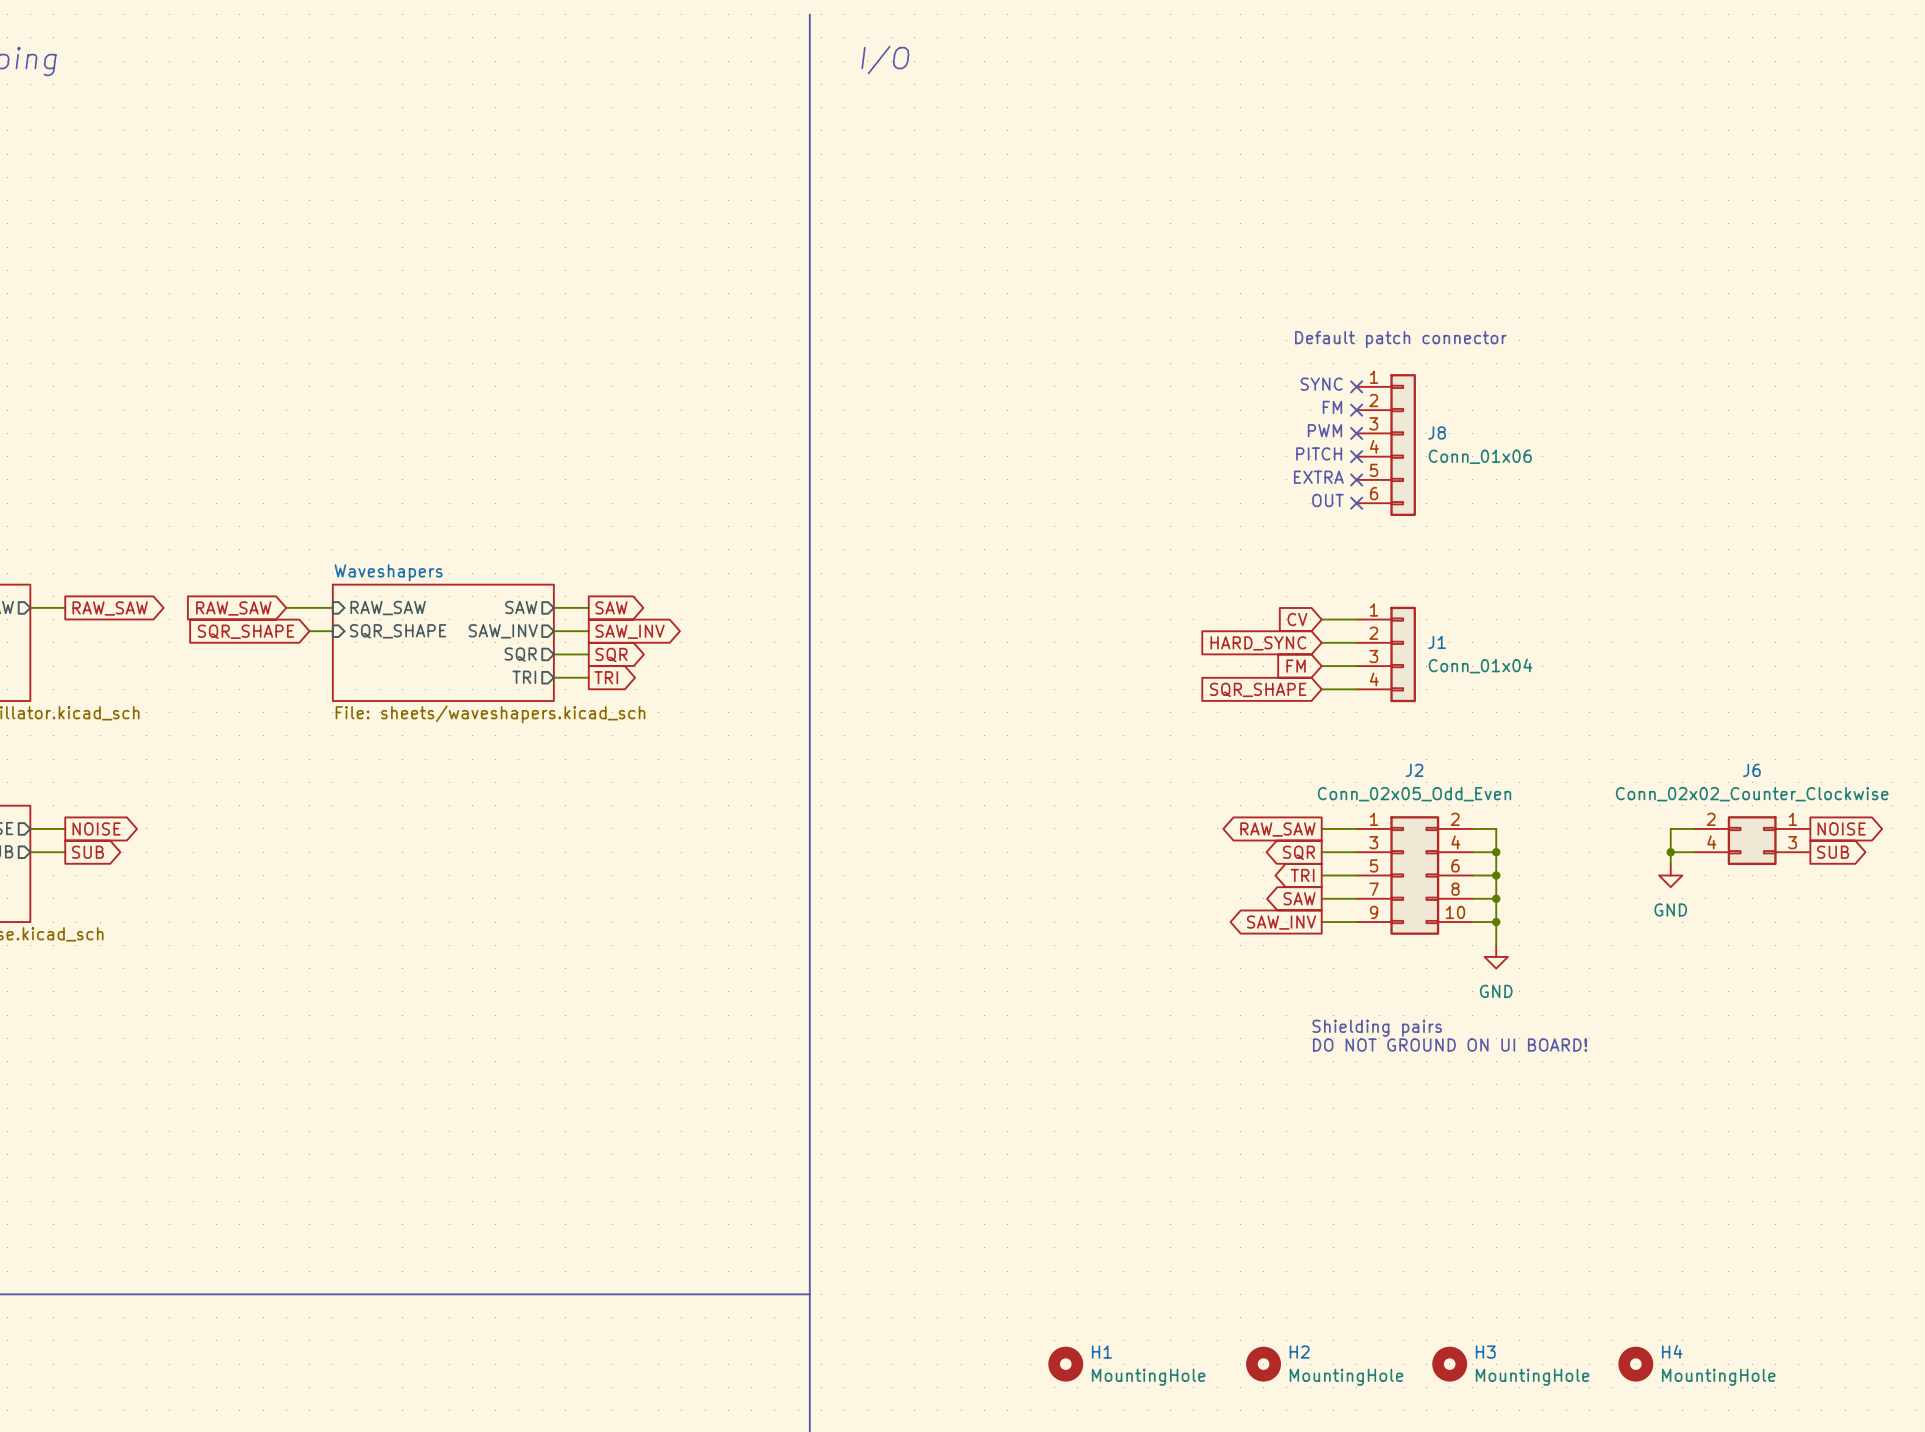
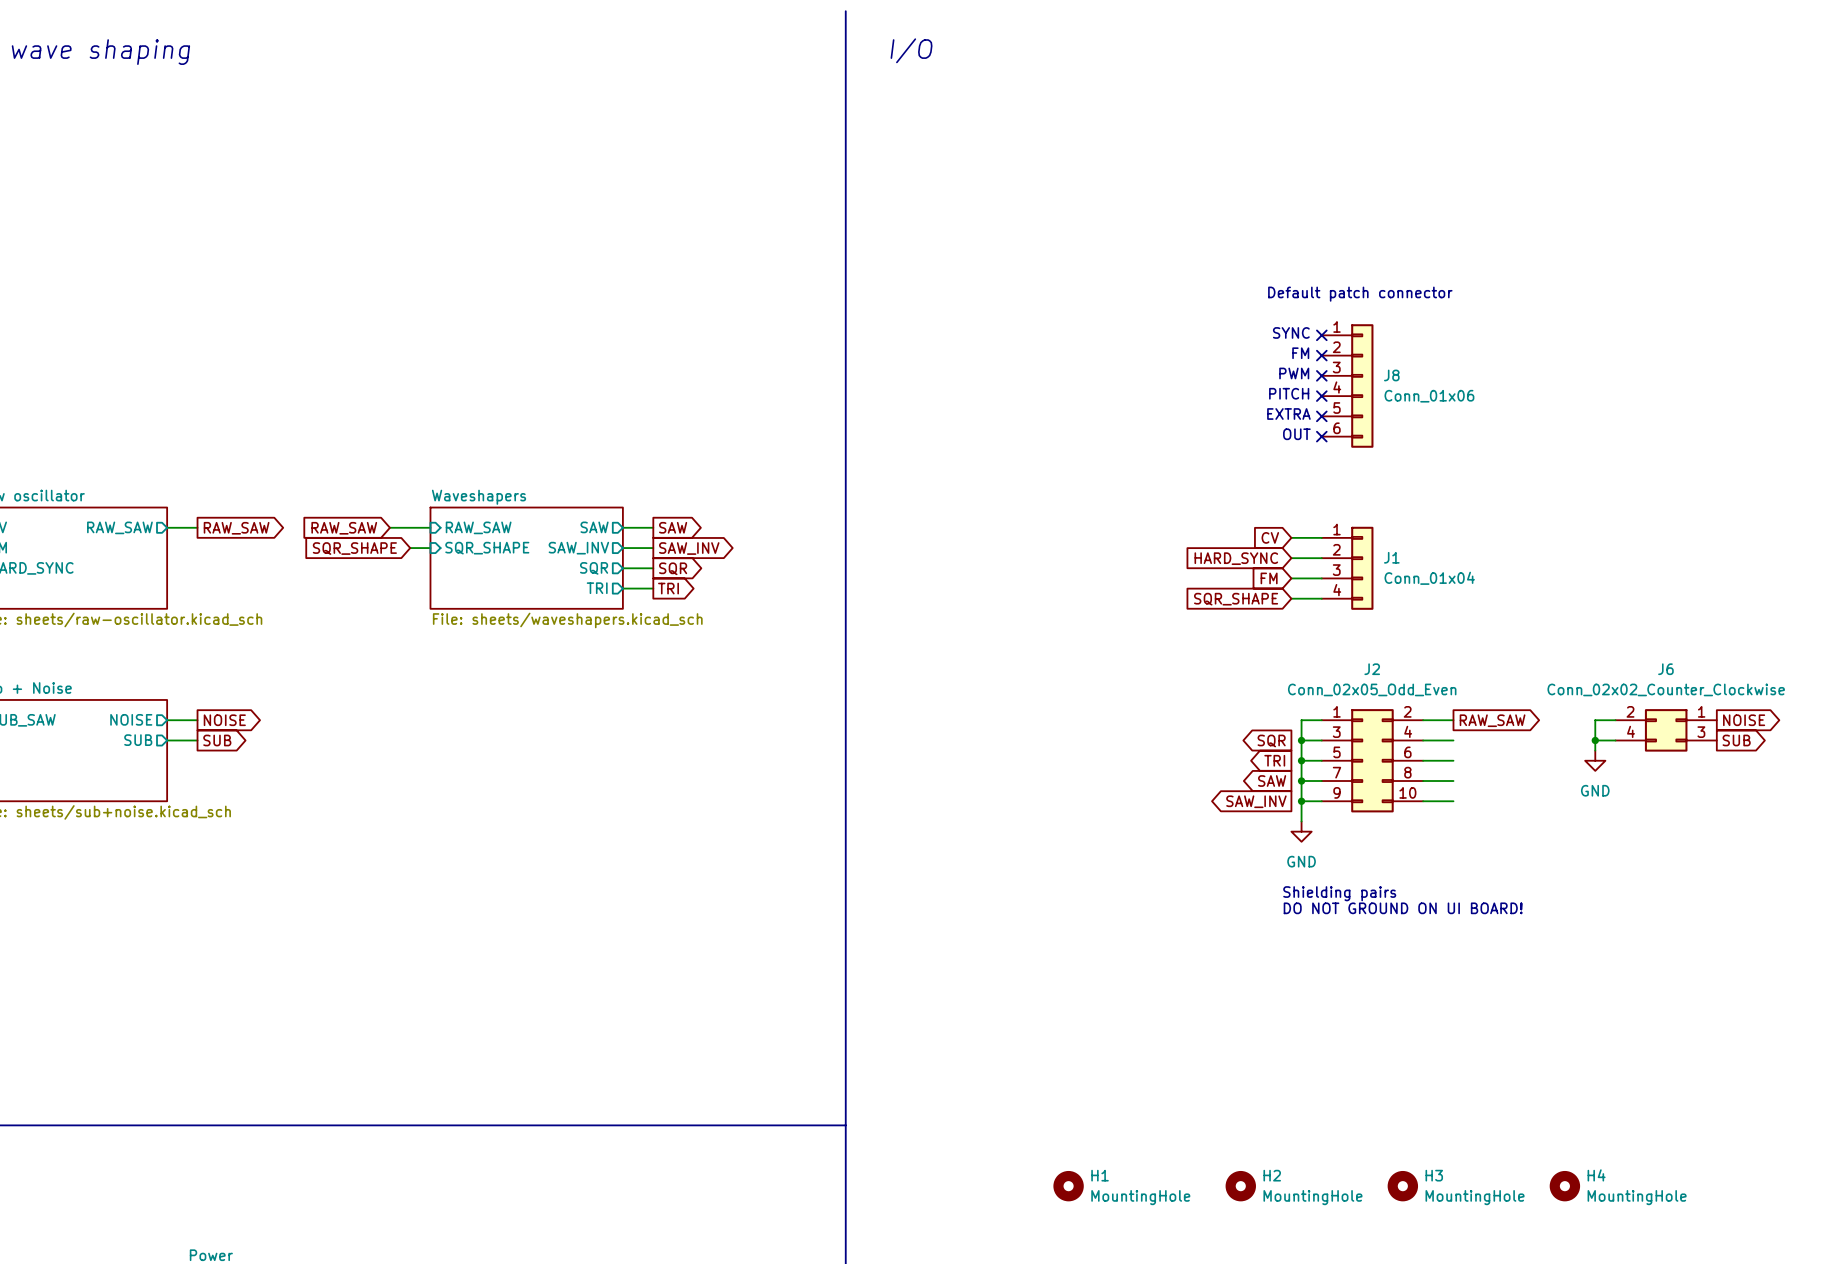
wire: (1321, 828) (1333, 828) -> (1301, 821) (1301, 720)
wire: (1496, 828) (1496, 945) -> (1443, 720) (1453, 720)
global label rotation: 0° (1277, 829) -> 180° (1492, 720)
global label position: RAW_SAW (1277, 829) -> RAW_SAW (1492, 720)
wire: (1321, 852) (1333, 852) -> (1443, 740) (1453, 740)
junction: none -> (1301, 740)
junction: (1496, 852) -> none
wire: (1321, 875) (1333, 875) -> (1443, 760) (1453, 760)
junction: none -> (1301, 760)
junction: (1496, 875) -> none
wire: (1321, 898) (1333, 898) -> (1443, 781) (1453, 781)
junction: none -> (1301, 781)
junction: (1496, 898) -> none
wire: (1321, 922) (1333, 922) -> (1443, 801) (1453, 801)
junction: none -> (1301, 801)
junction: (1496, 922) -> none
power symbol position: GND (1496, 956) -> GND (1301, 831)

